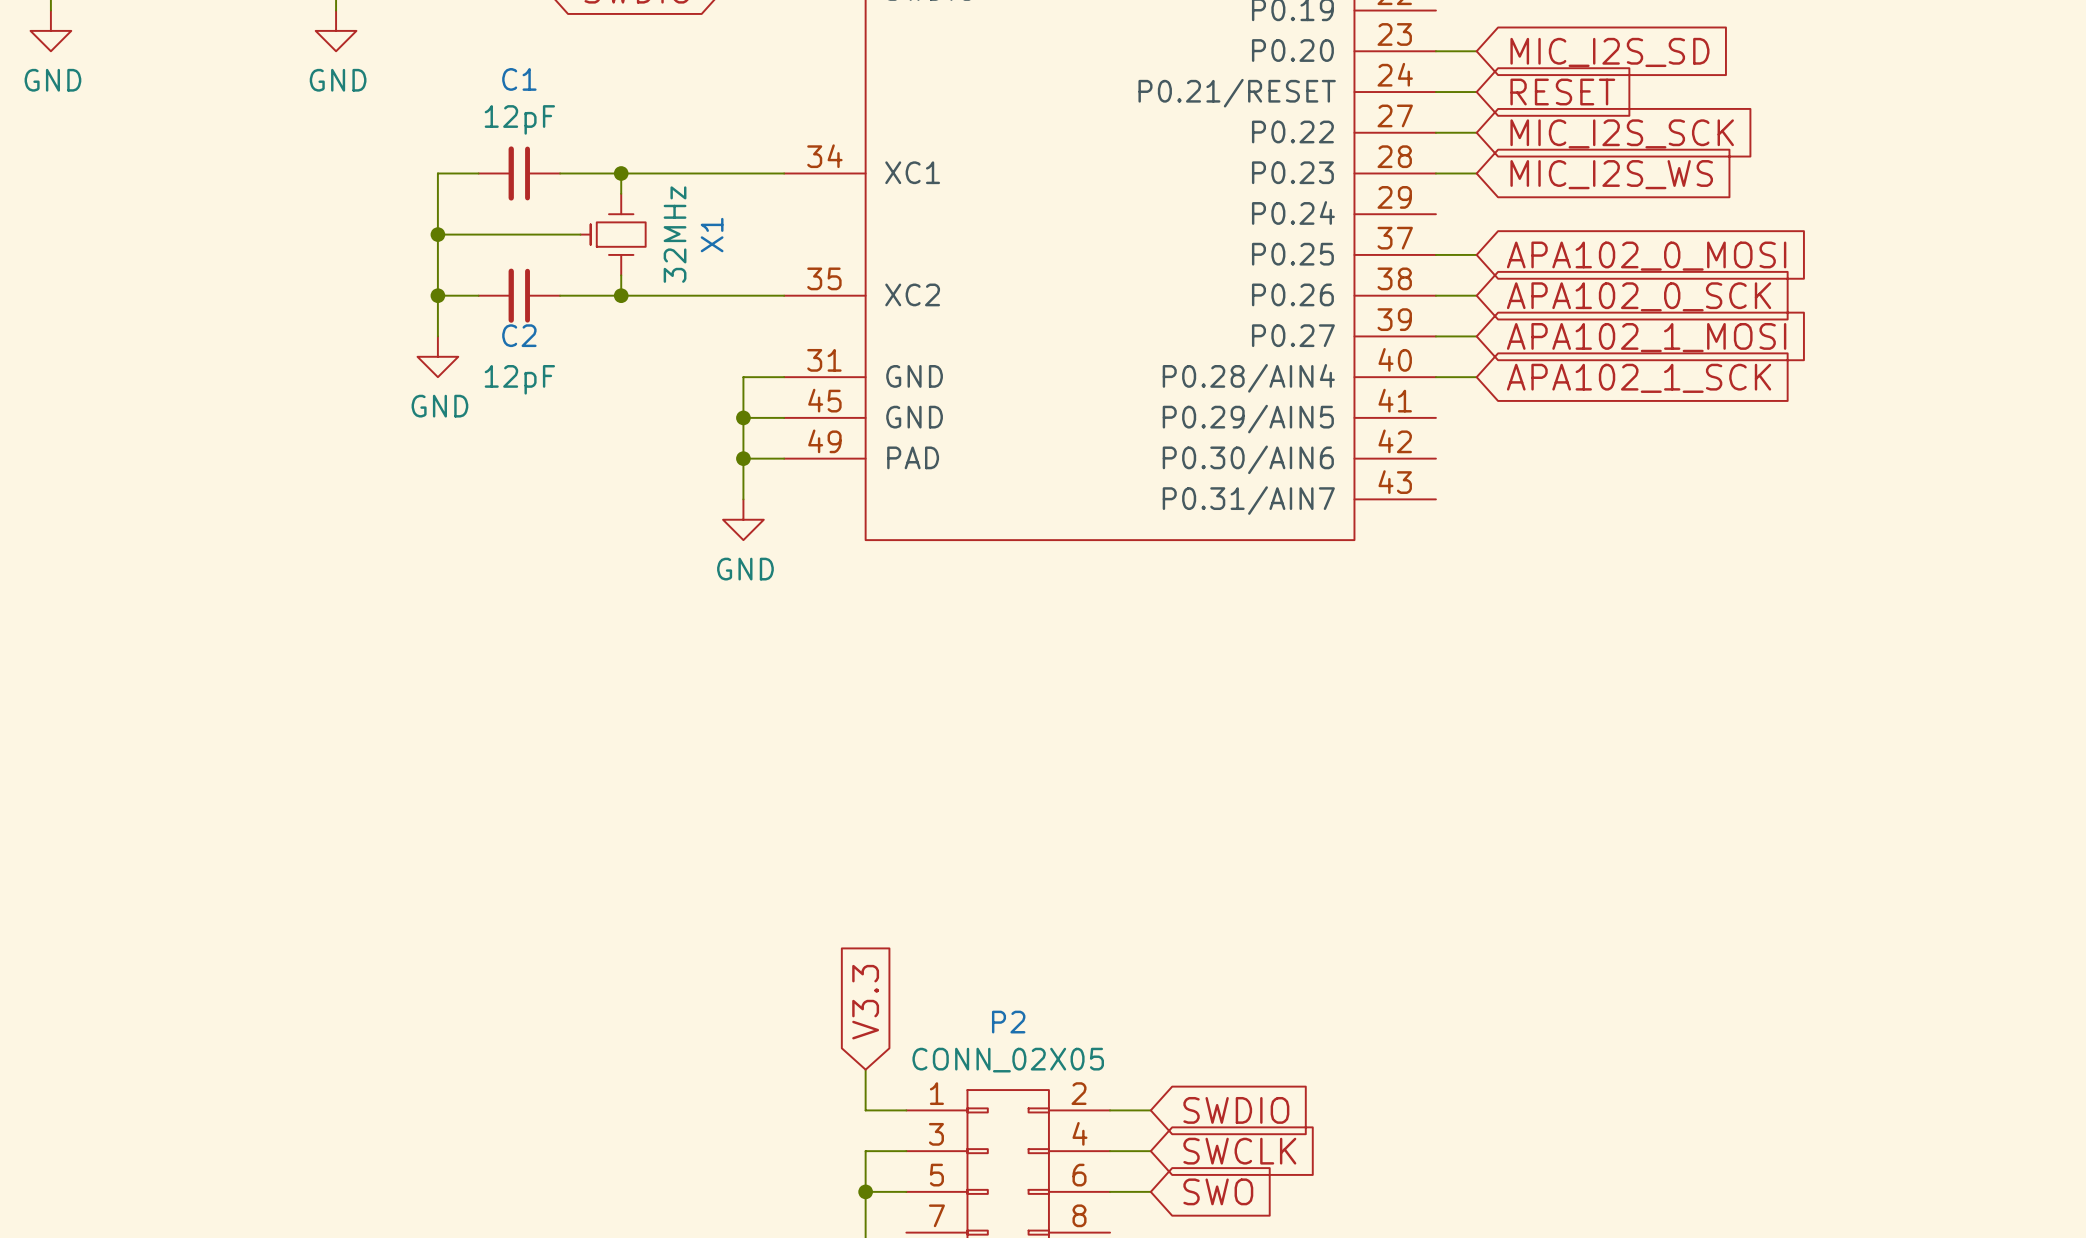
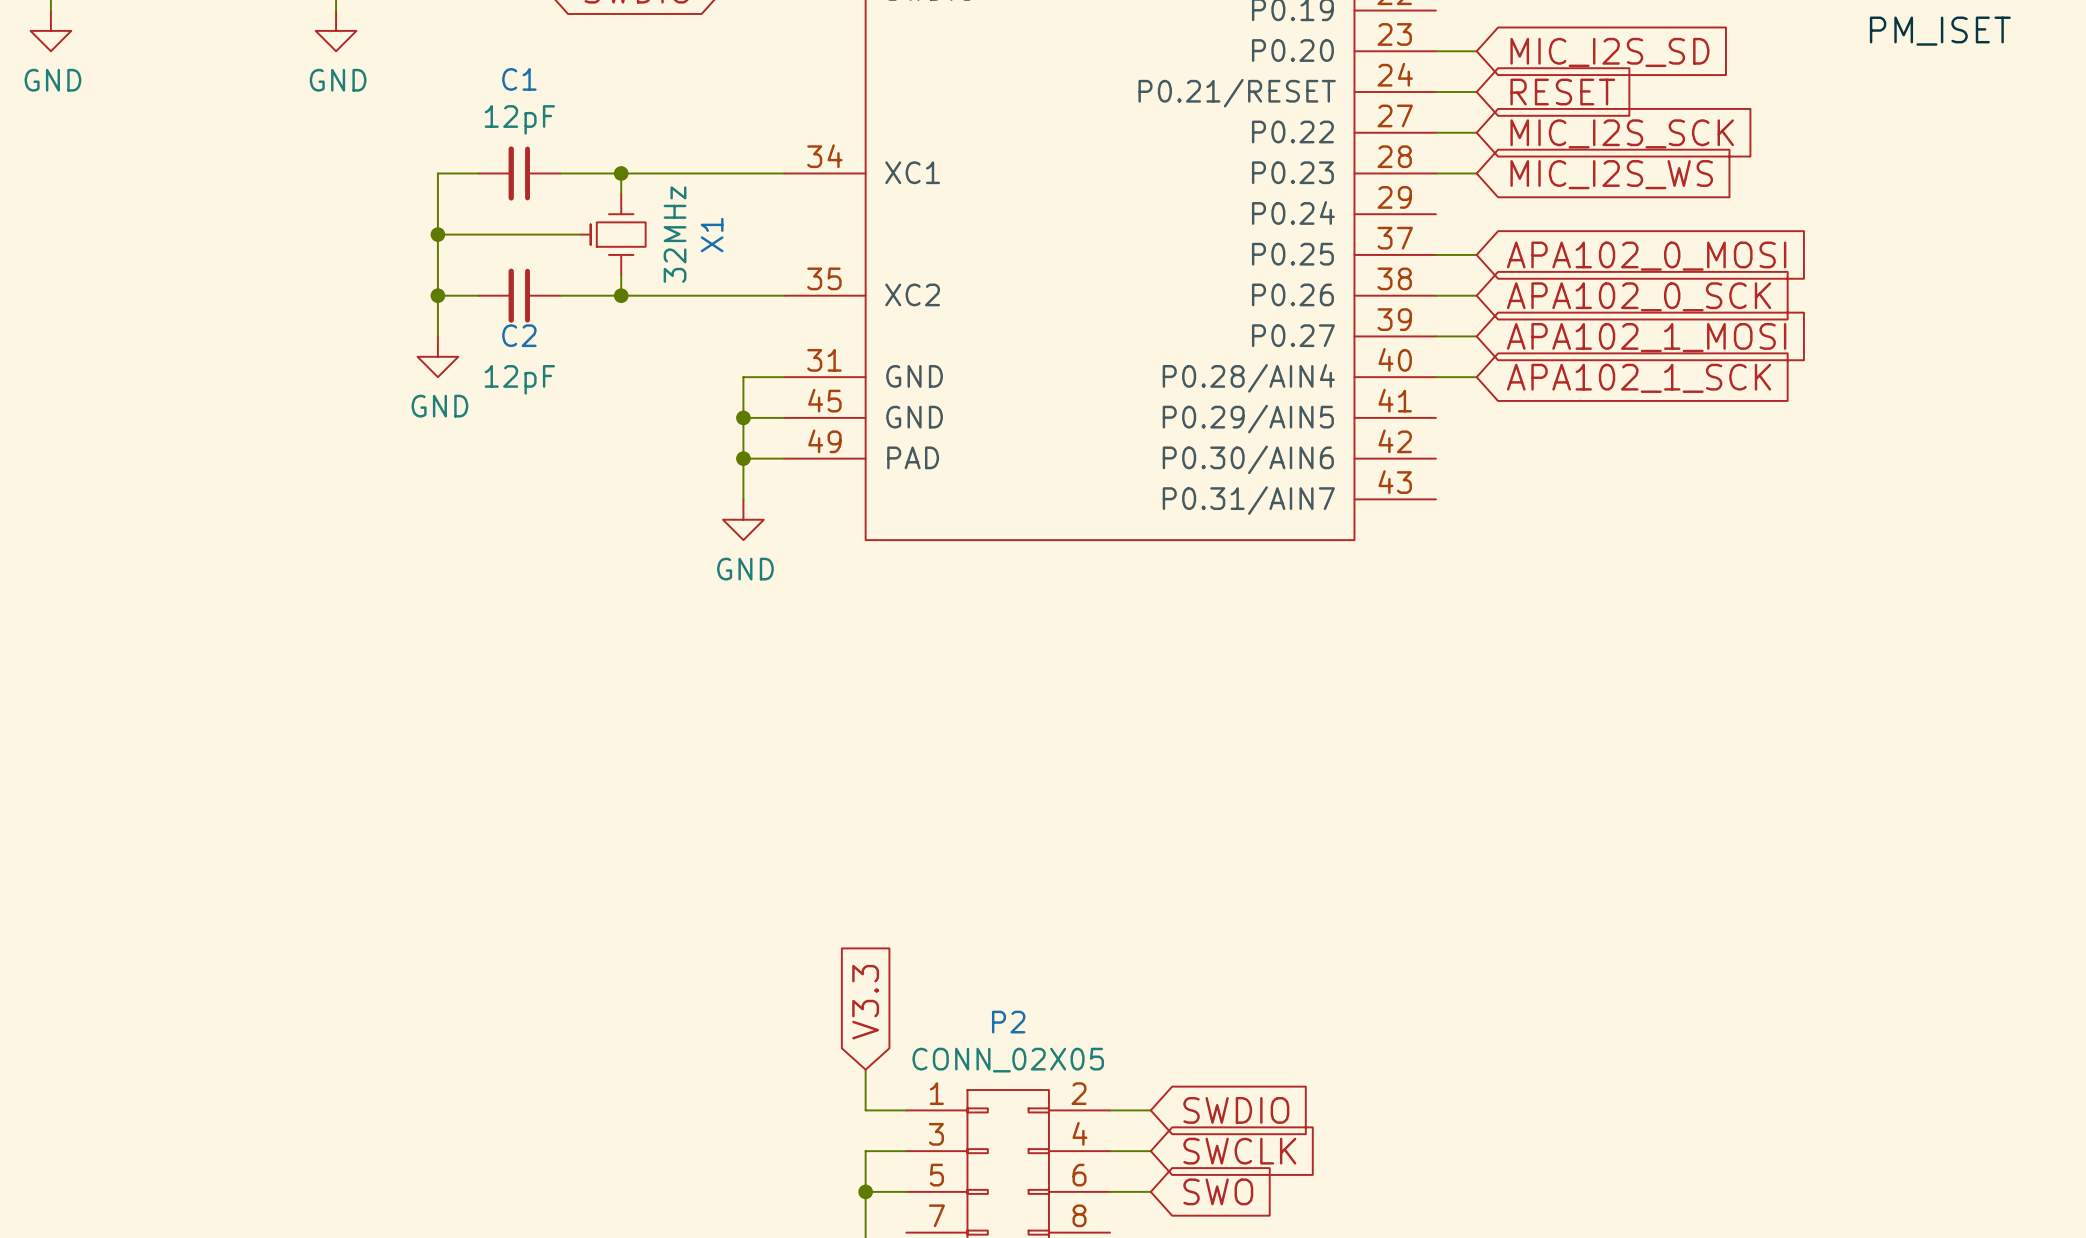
label: none -> PM_ISET (1940, 31)

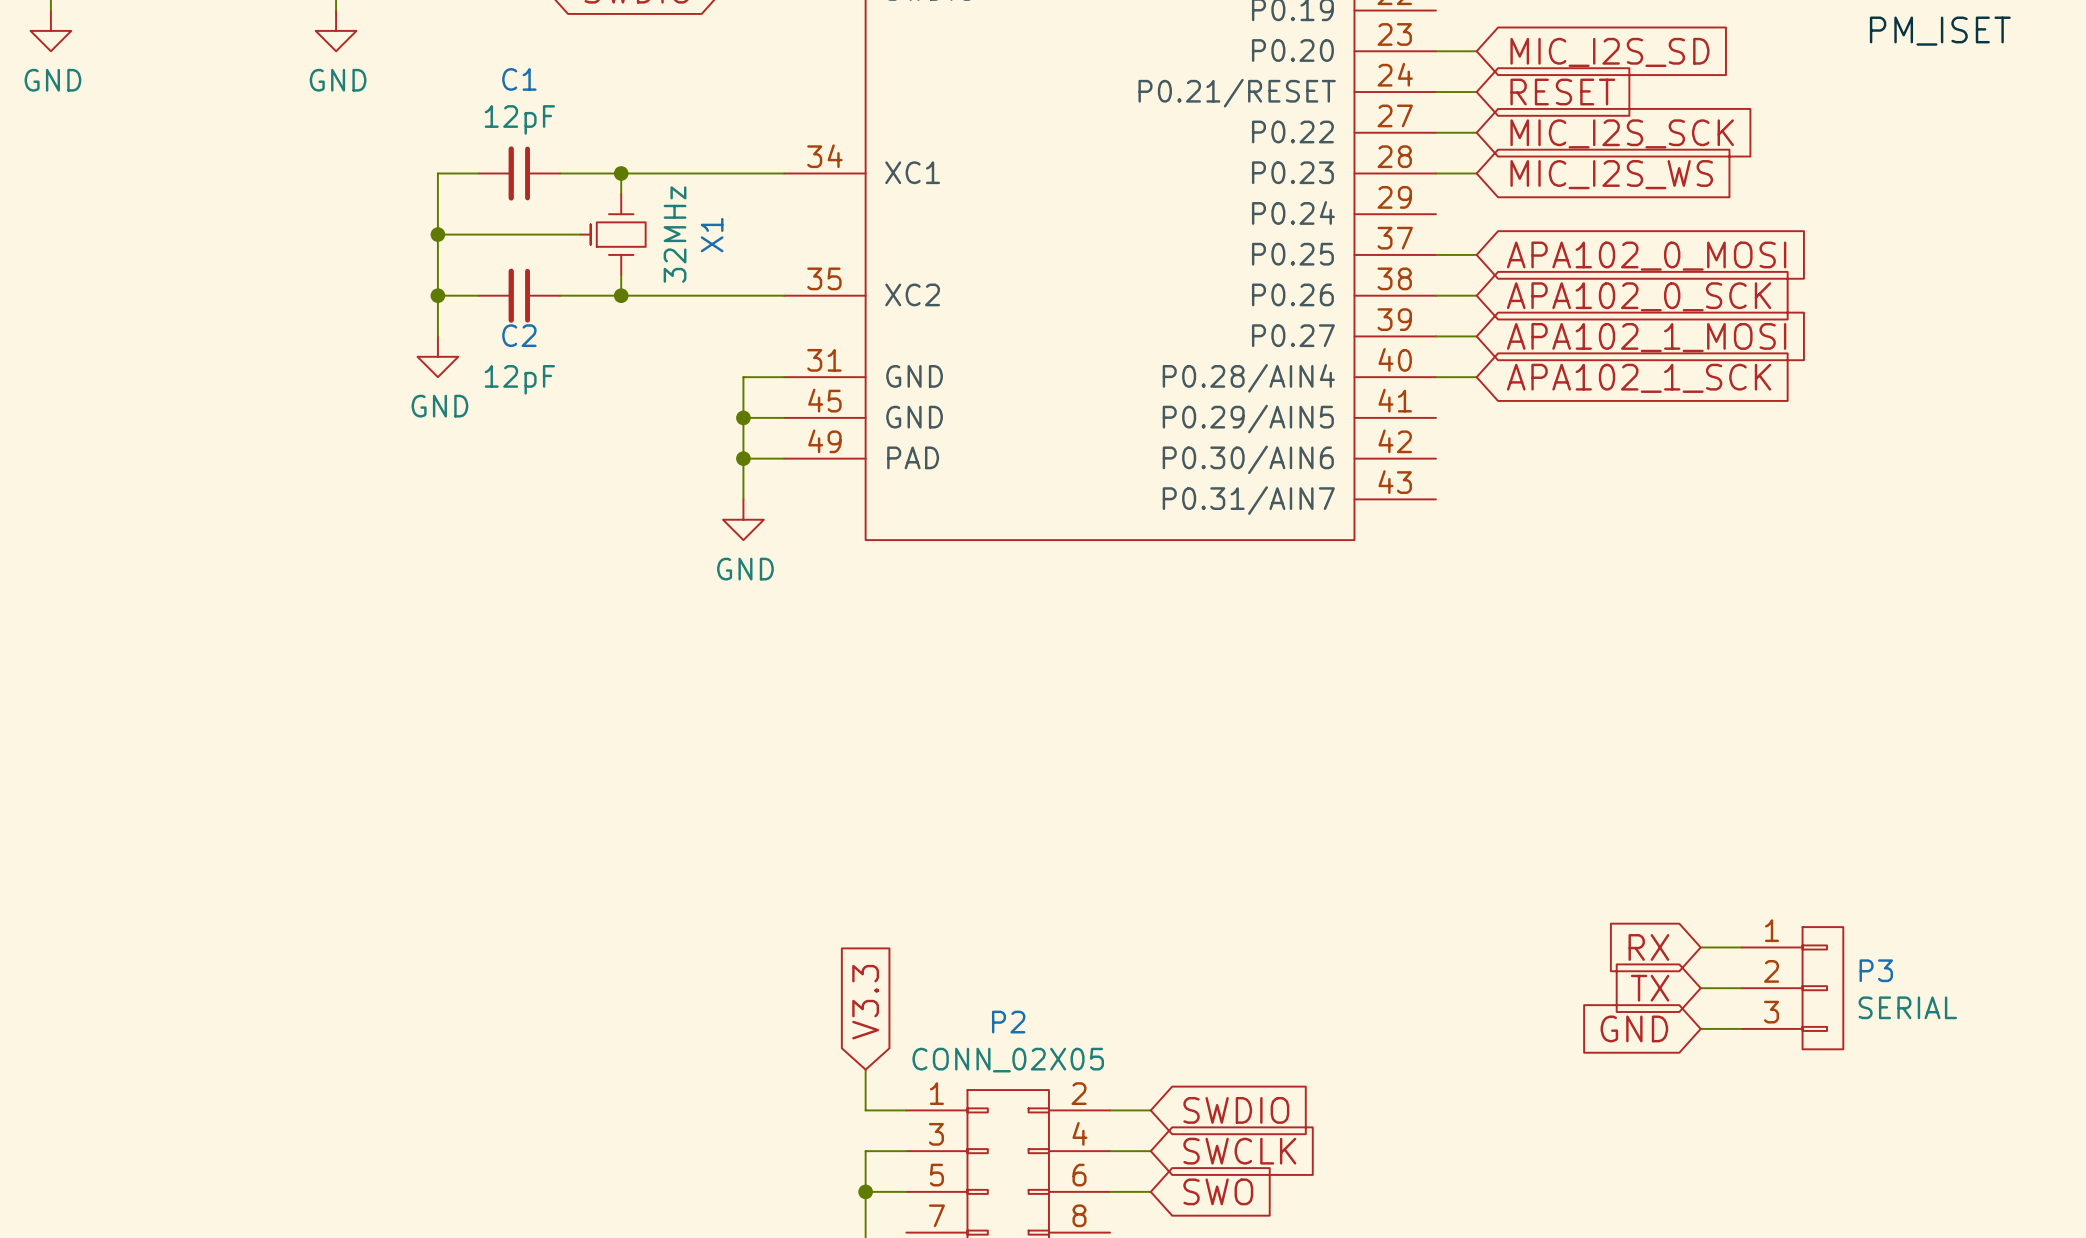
global label: none -> RX (1648, 947)
wire: none -> (1700, 947) (1741, 947)
global label: none -> TX (1650, 988)
wire: none -> (1700, 988) (1741, 988)
P3: none -> SERIAL (1792, 988)
global label: none -> GND (1634, 1028)
wire: none -> (1700, 1028) (1741, 1028)

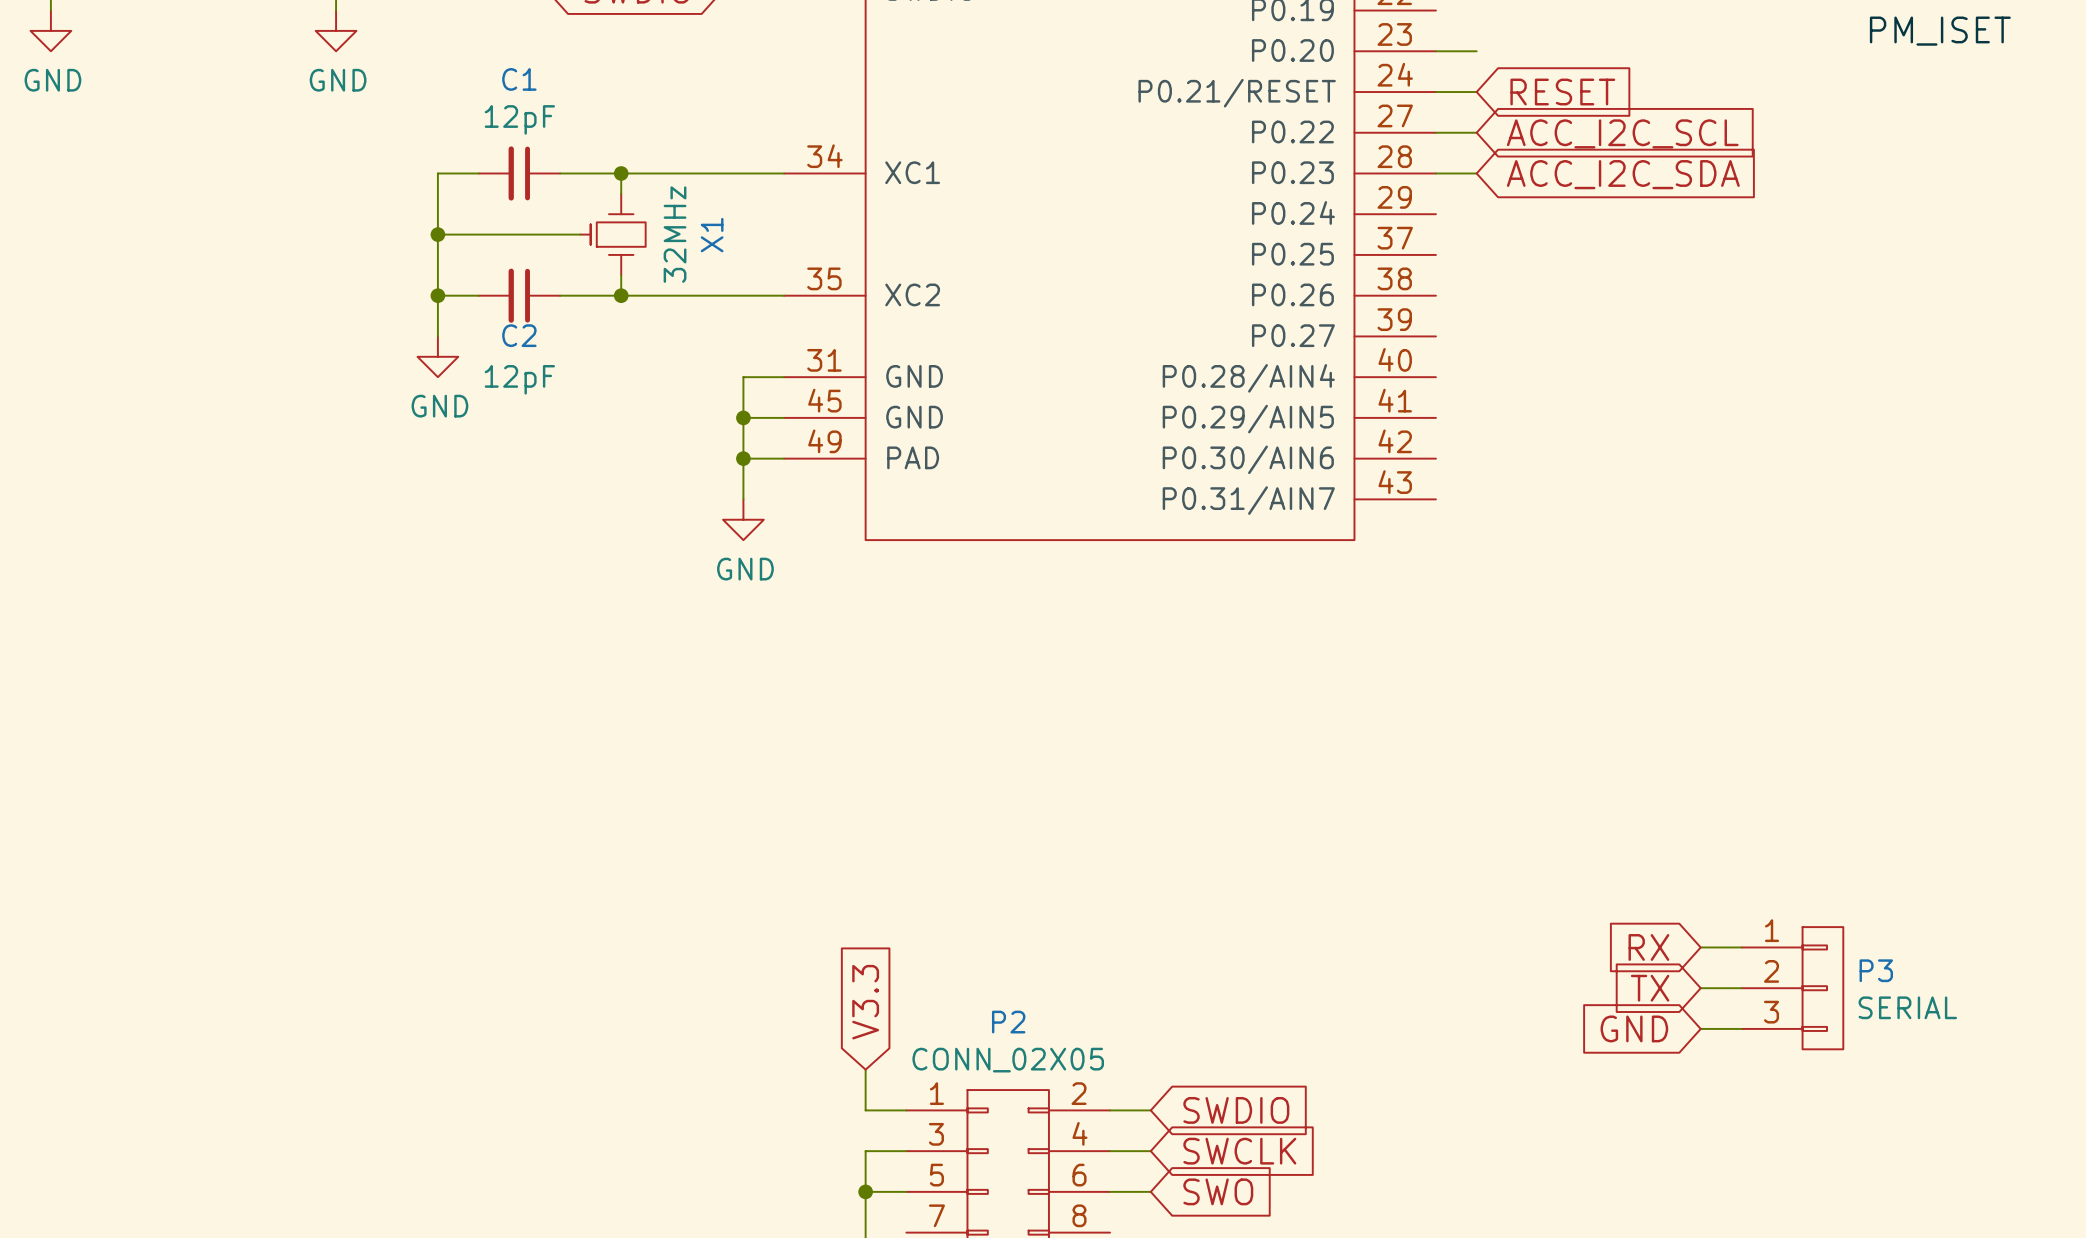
global label: MIC_I2S_SD (1609, 52) -> none
global label: MIC_I2S_SCK (1622, 133) -> ACC_I2C_SCL (1622, 133)
global label: MIC_I2S_WS (1611, 174) -> ACC_I2C_SDA (1623, 174)
wire: (1435, 254) (1476, 254) -> none
global label: APA102_0_MOSI (1646, 256) -> none
wire: (1435, 295) (1476, 295) -> none
global label: APA102_0_SCK (1639, 296) -> none
wire: (1435, 336) (1476, 336) -> none
global label: APA102_1_MOSI (1646, 337) -> none
wire: (1435, 377) (1476, 377) -> none
global label: APA102_1_SCK (1639, 378) -> none

